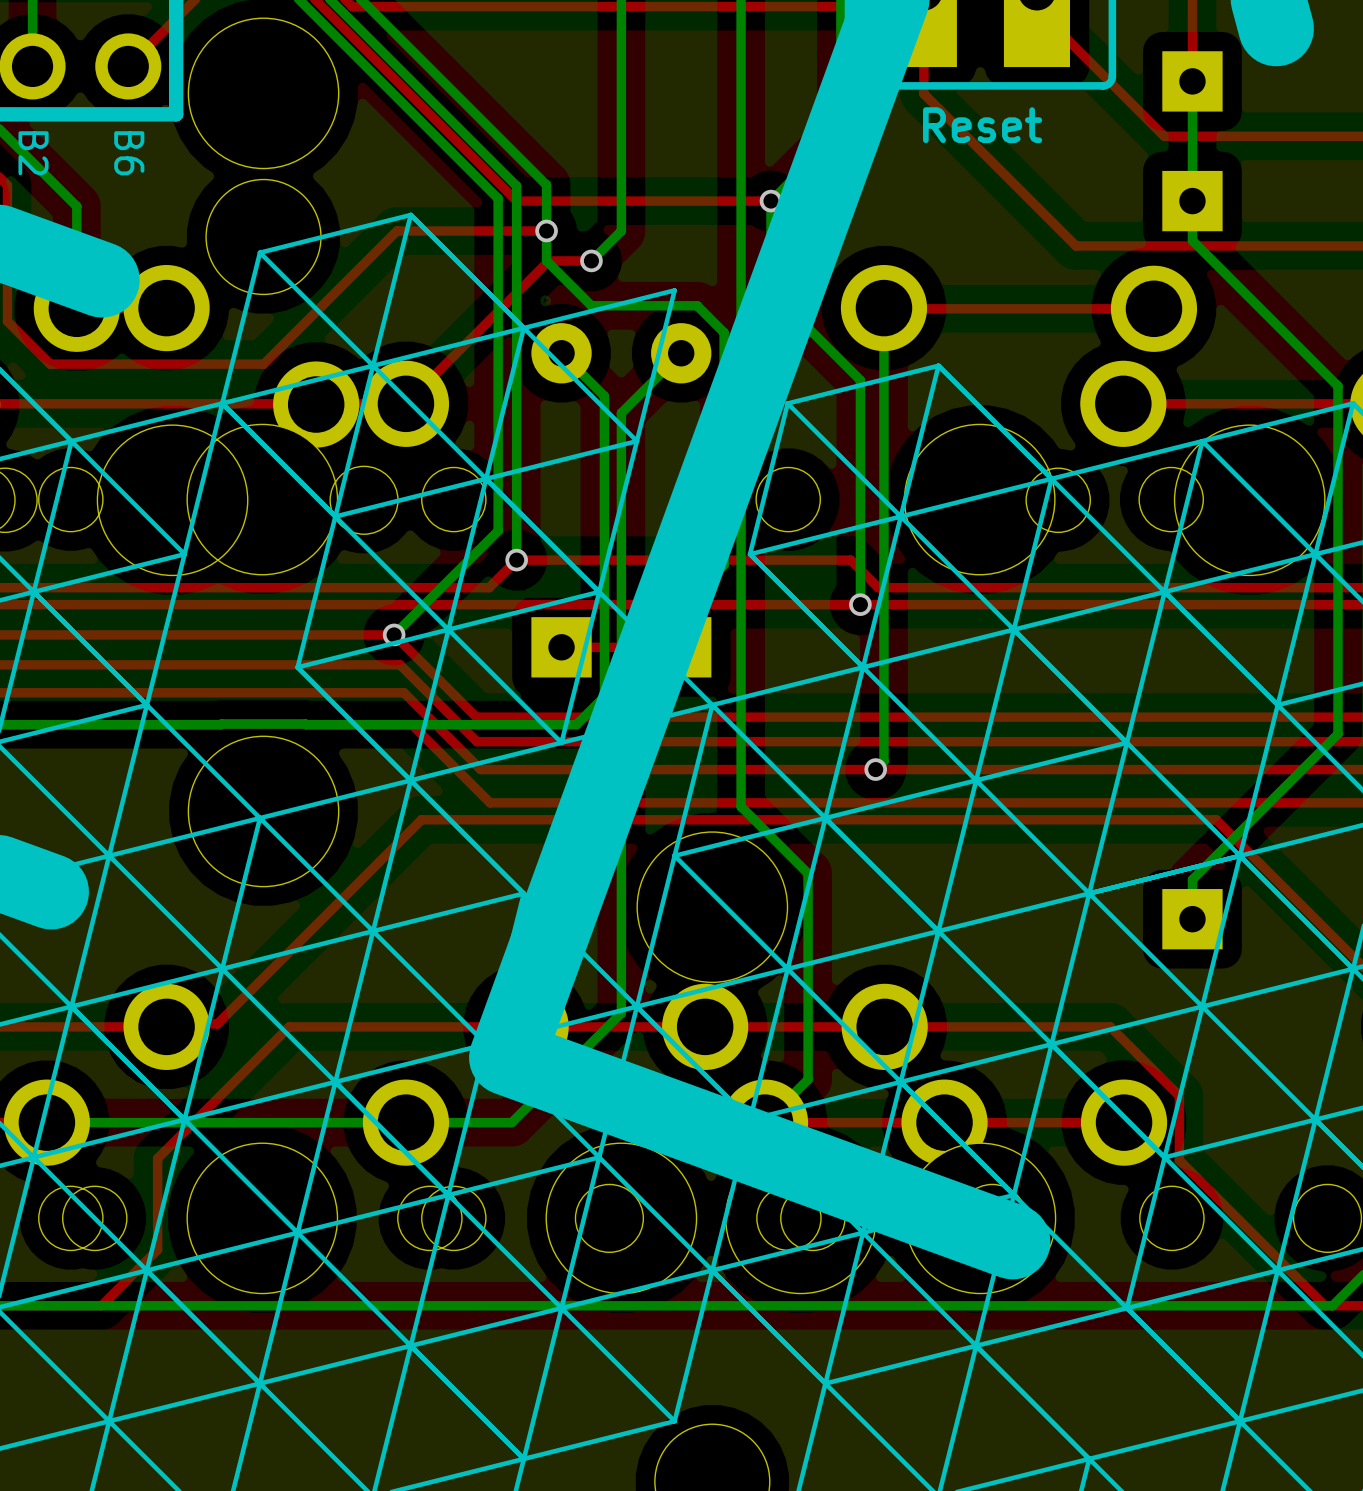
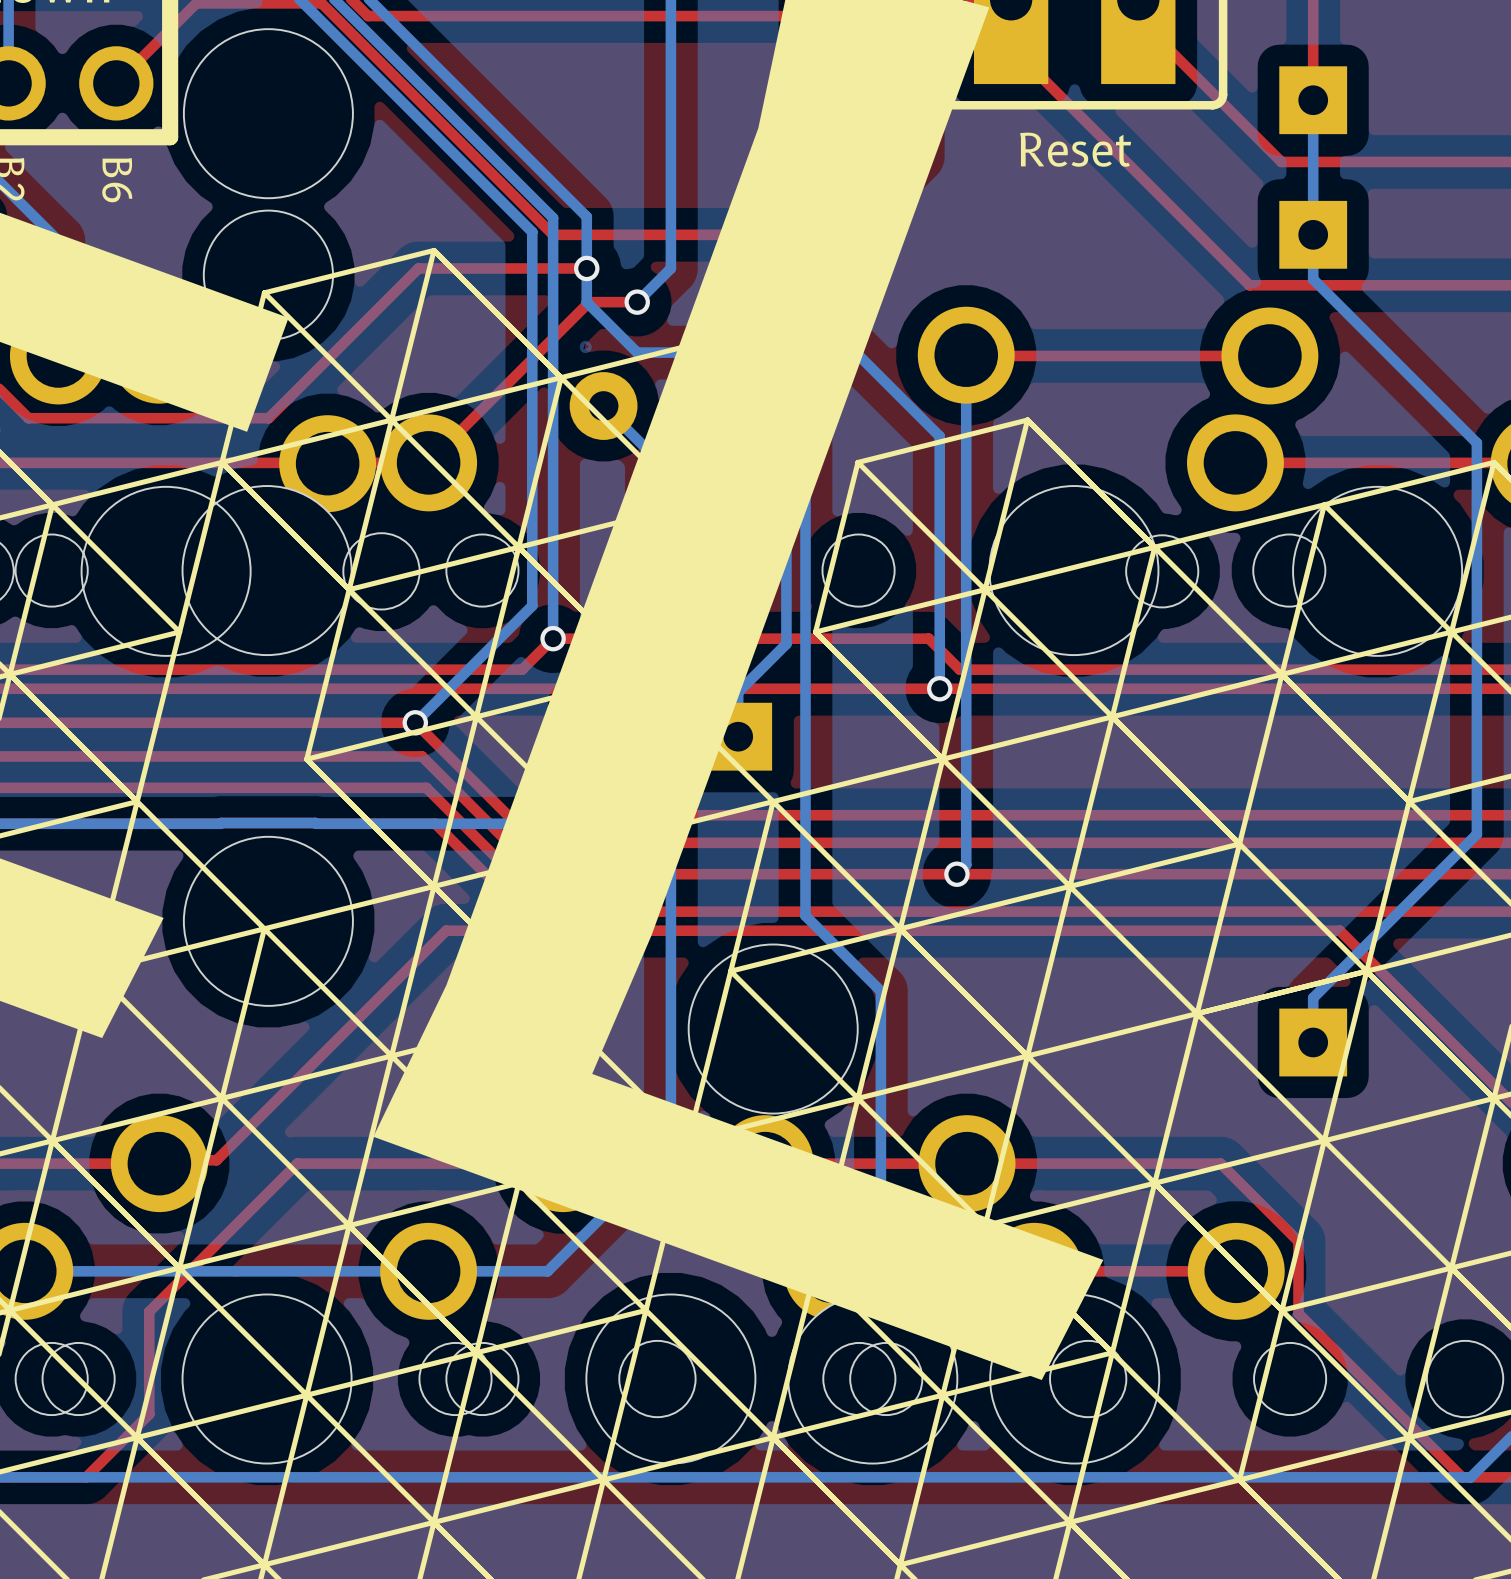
top track: (923, 33) (923, 93) (1076, 245) (1135, 245) -> (1011, 46) (1249, 285)

